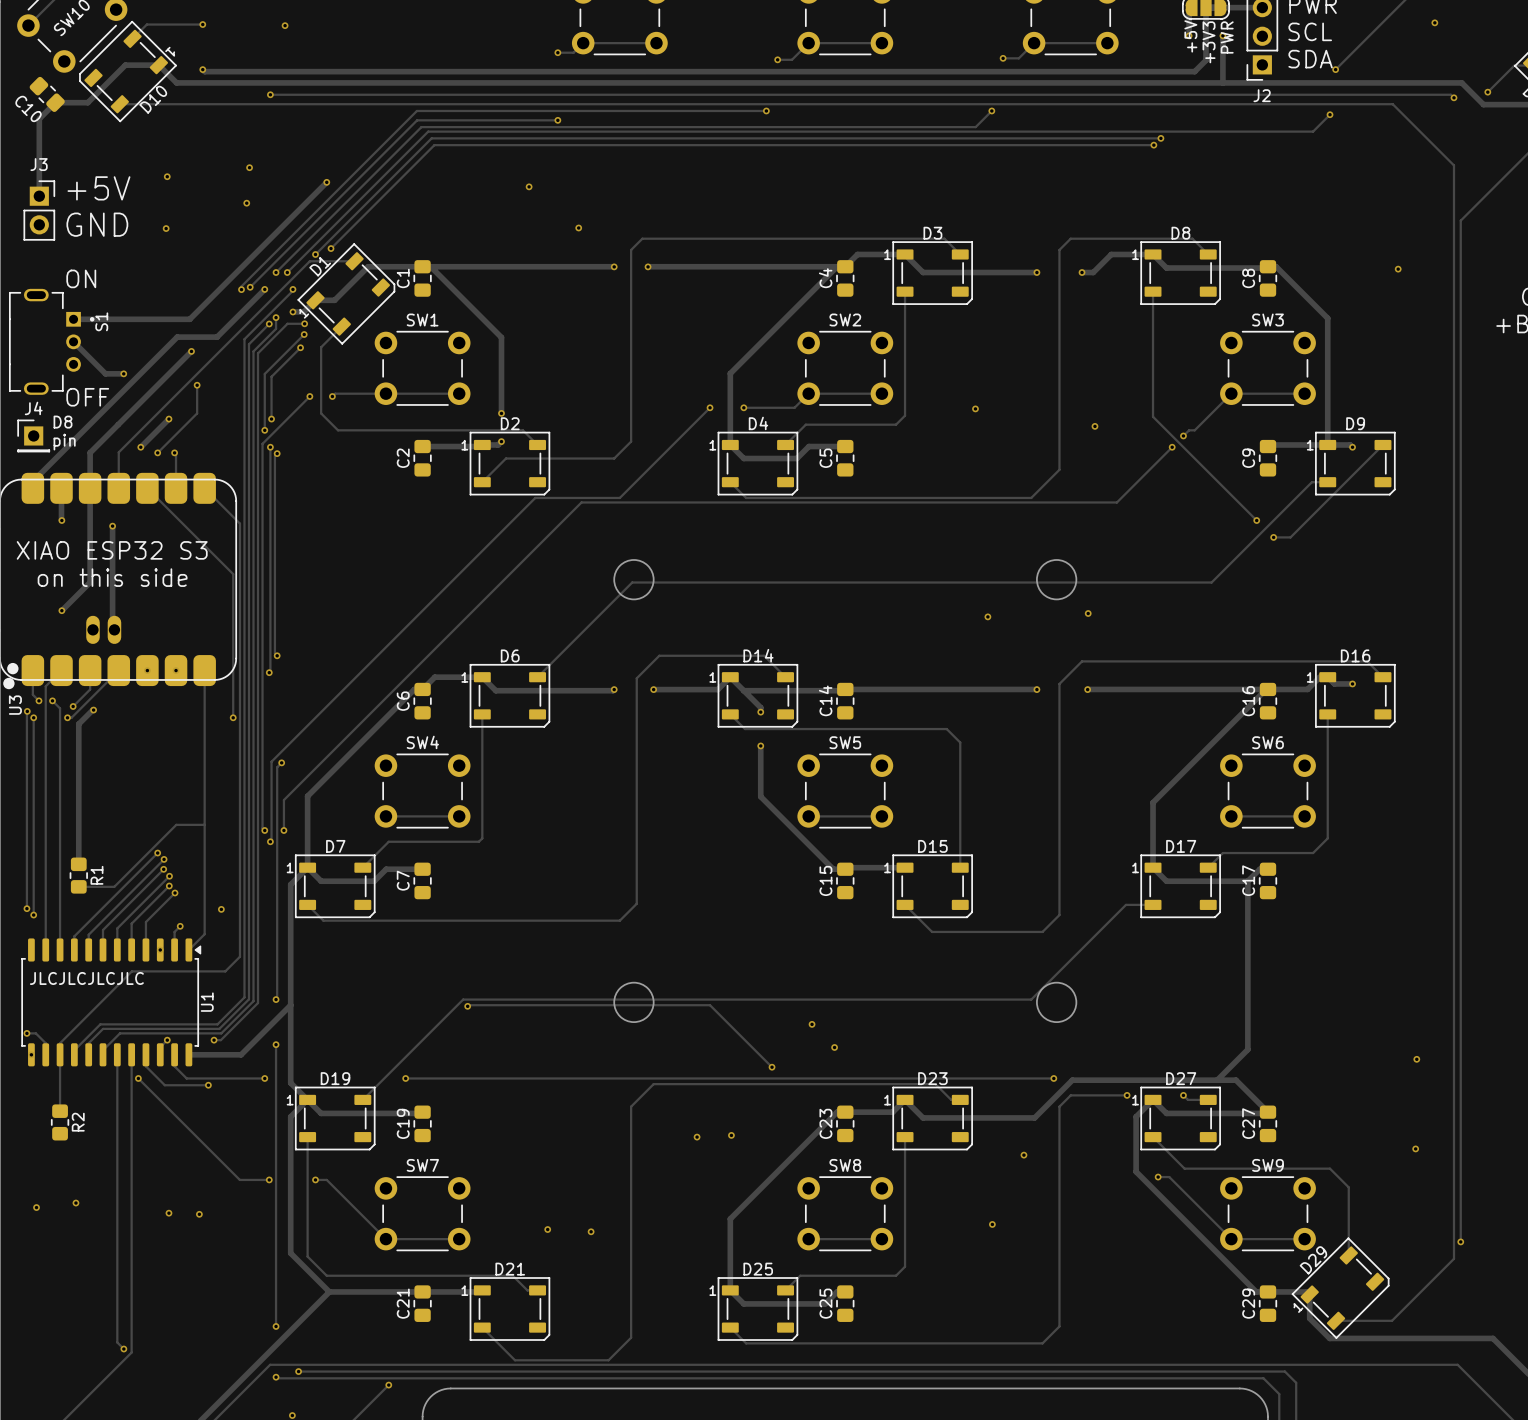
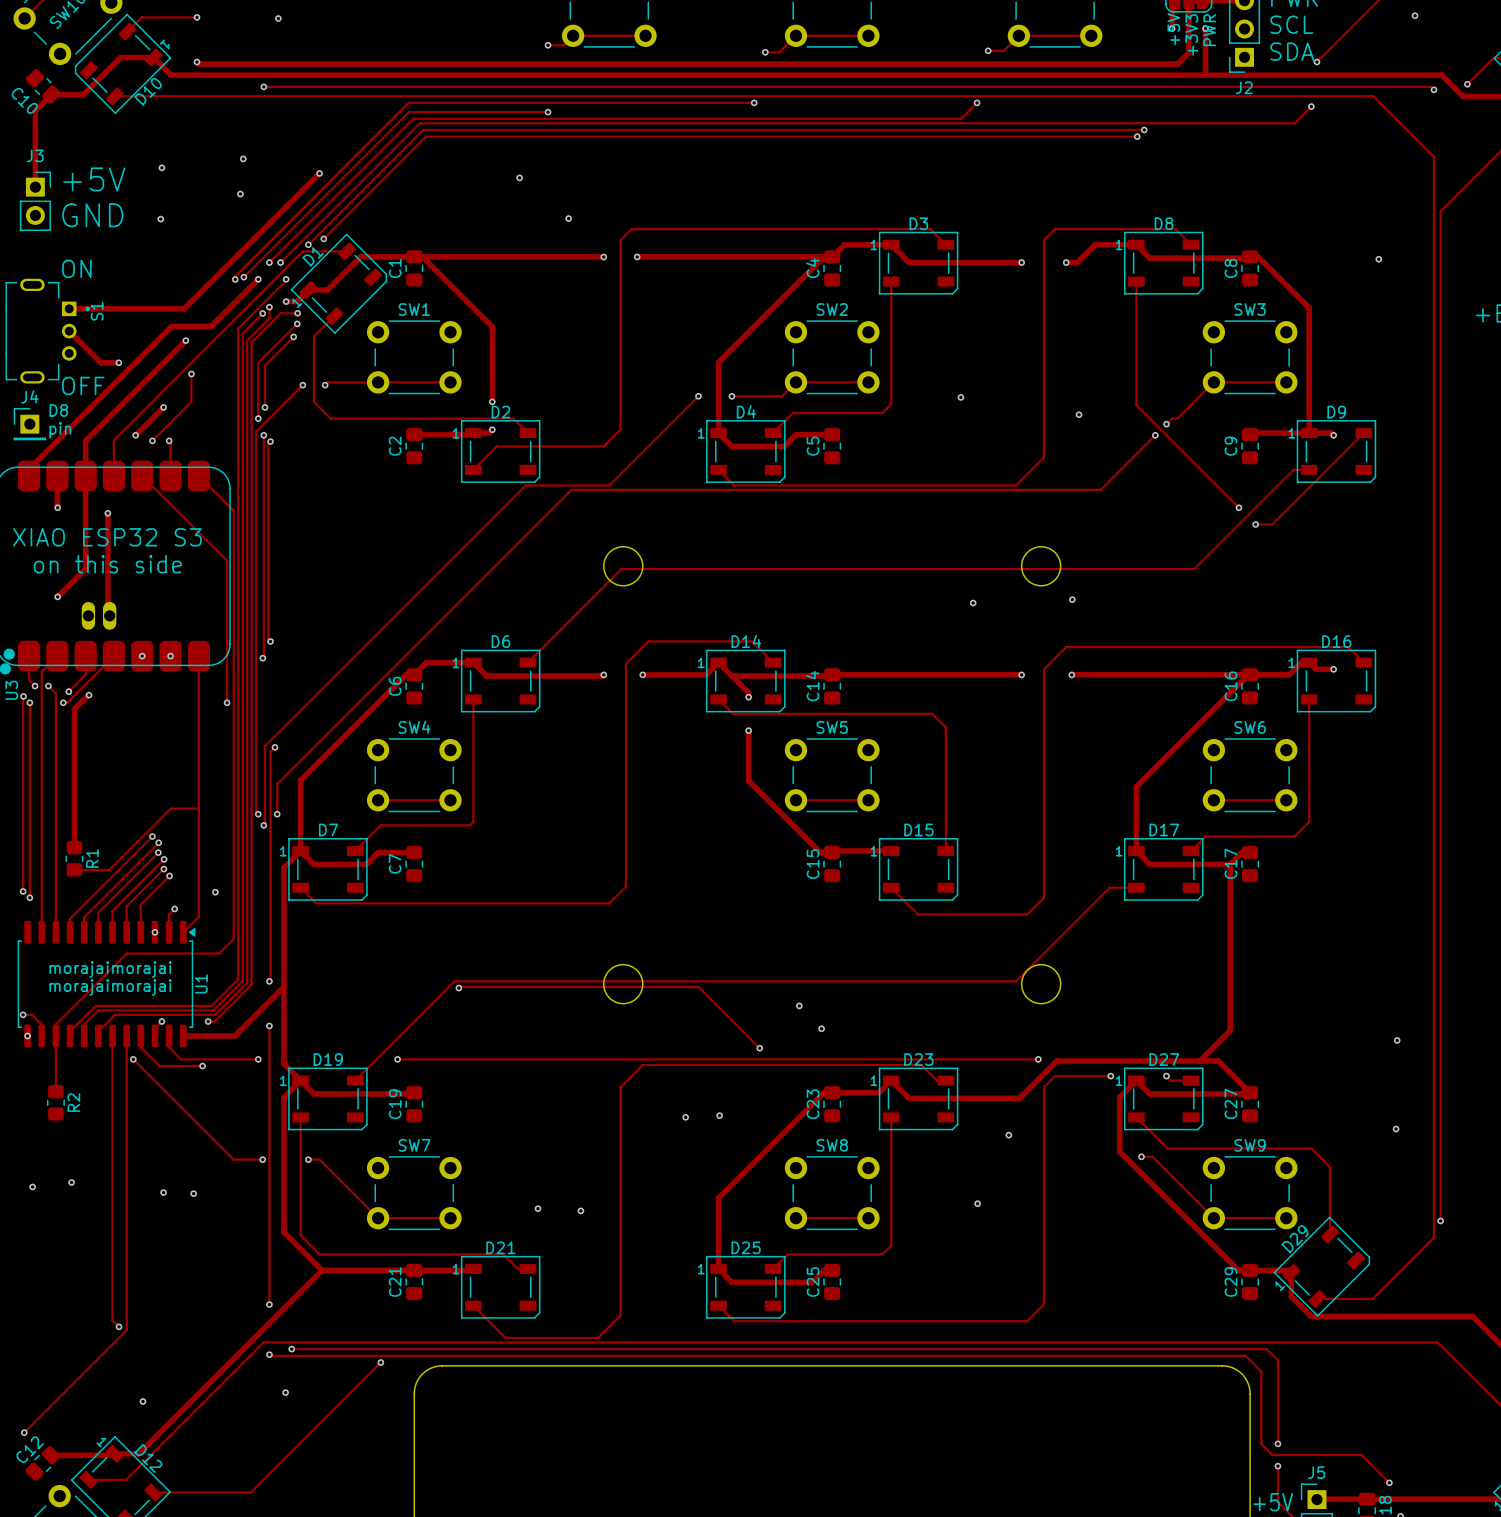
text: JLCJLCJLCJLC (86, 978) -> none
text: none -> morajaimorajai (110, 969)
text: none -> morajaimorajai (110, 987)

